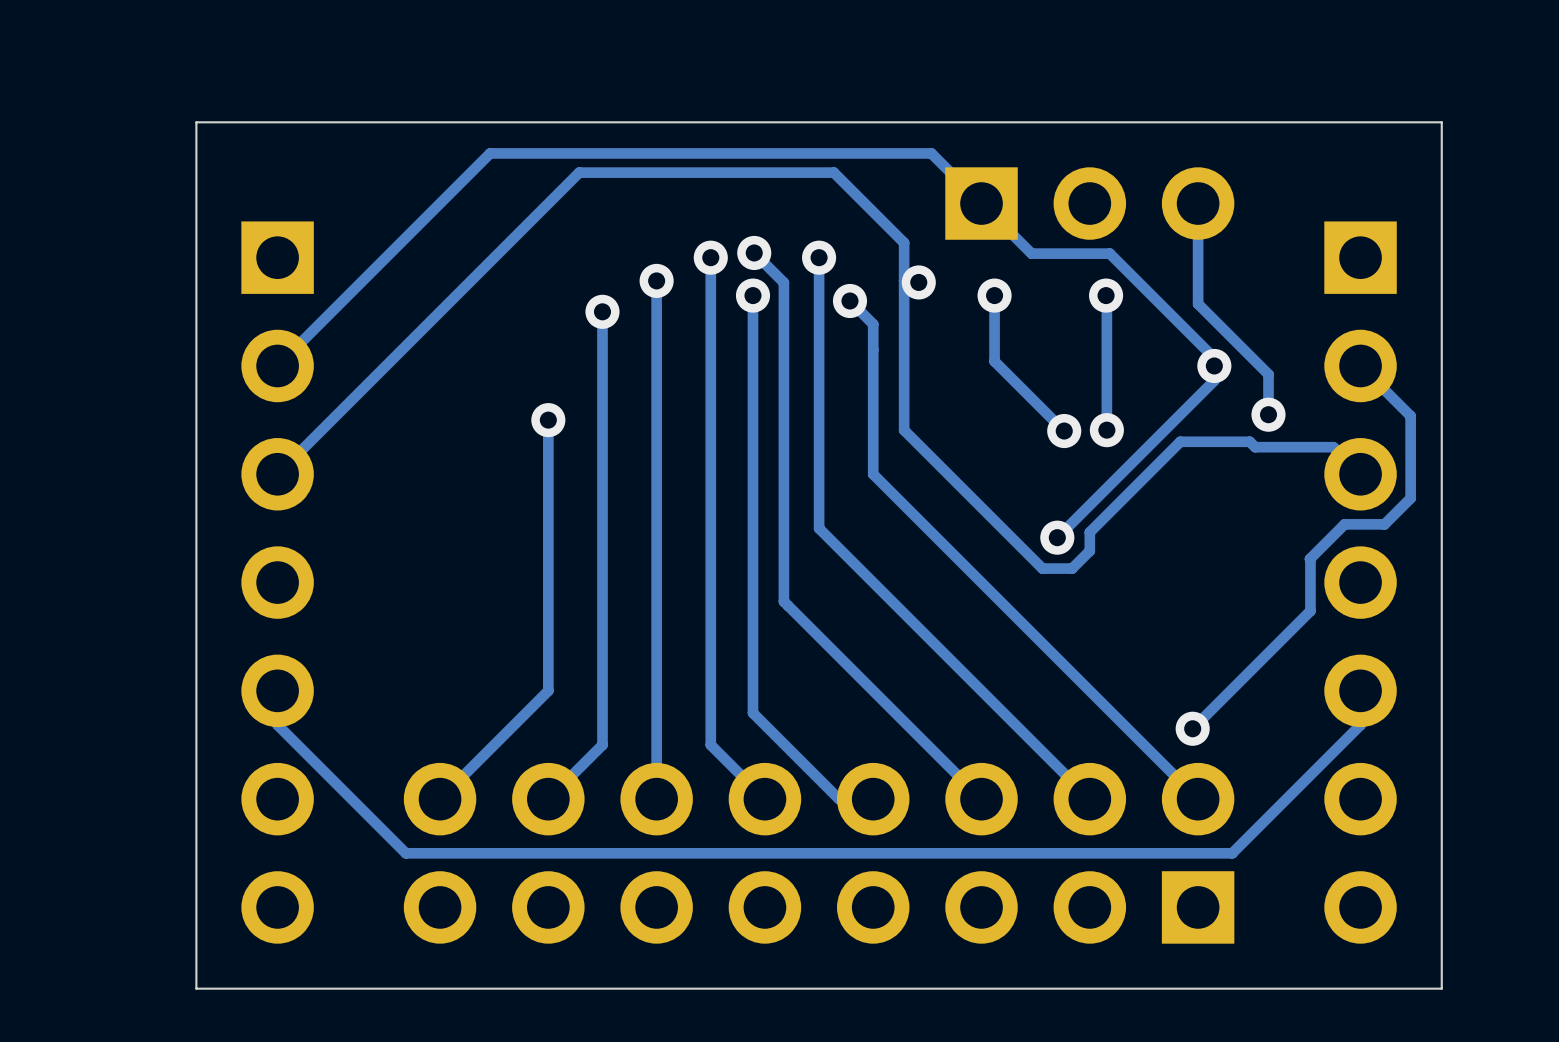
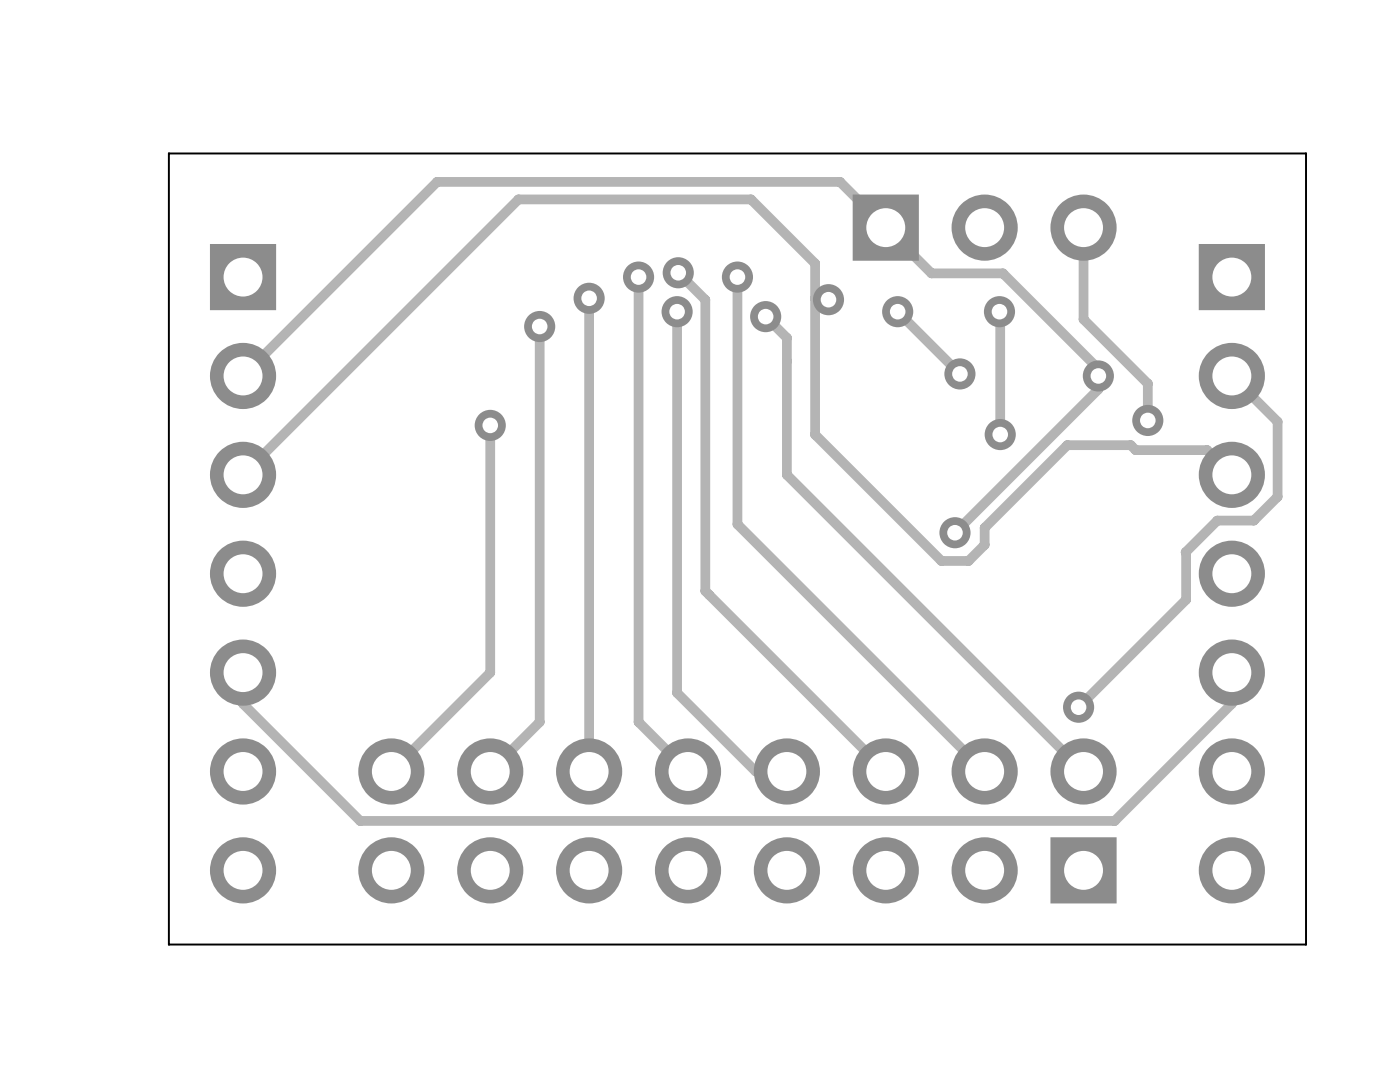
track: (994, 295) (994, 361) (1064, 431) -> (897, 311) (959, 373)
via position: (1064, 431) -> (959, 373)

